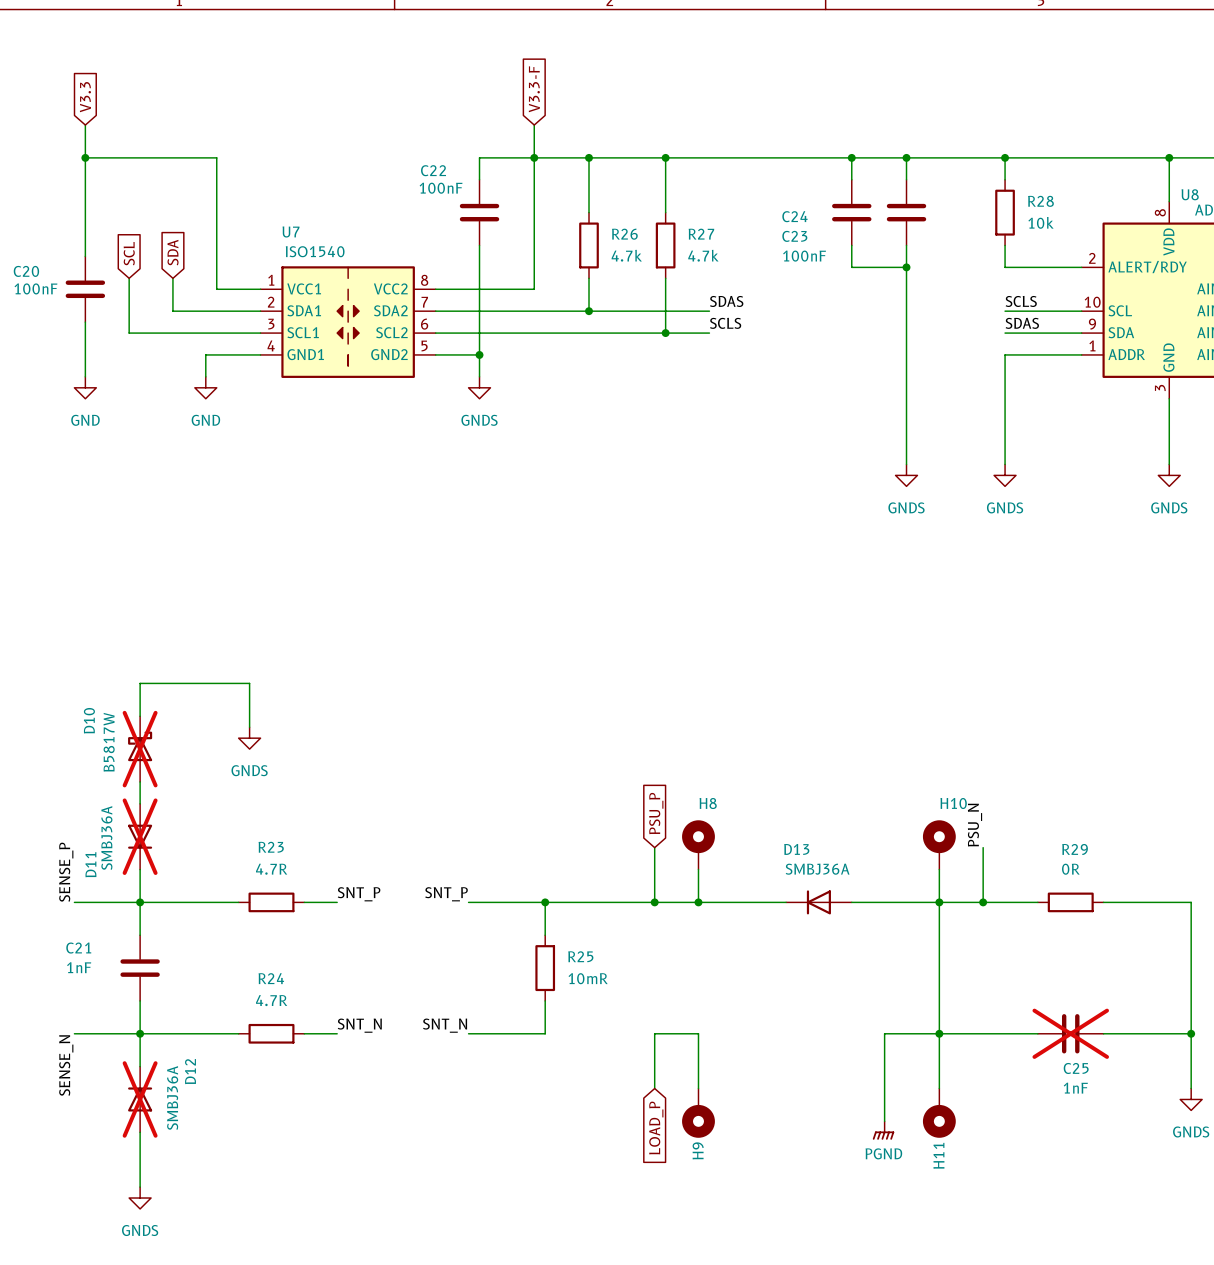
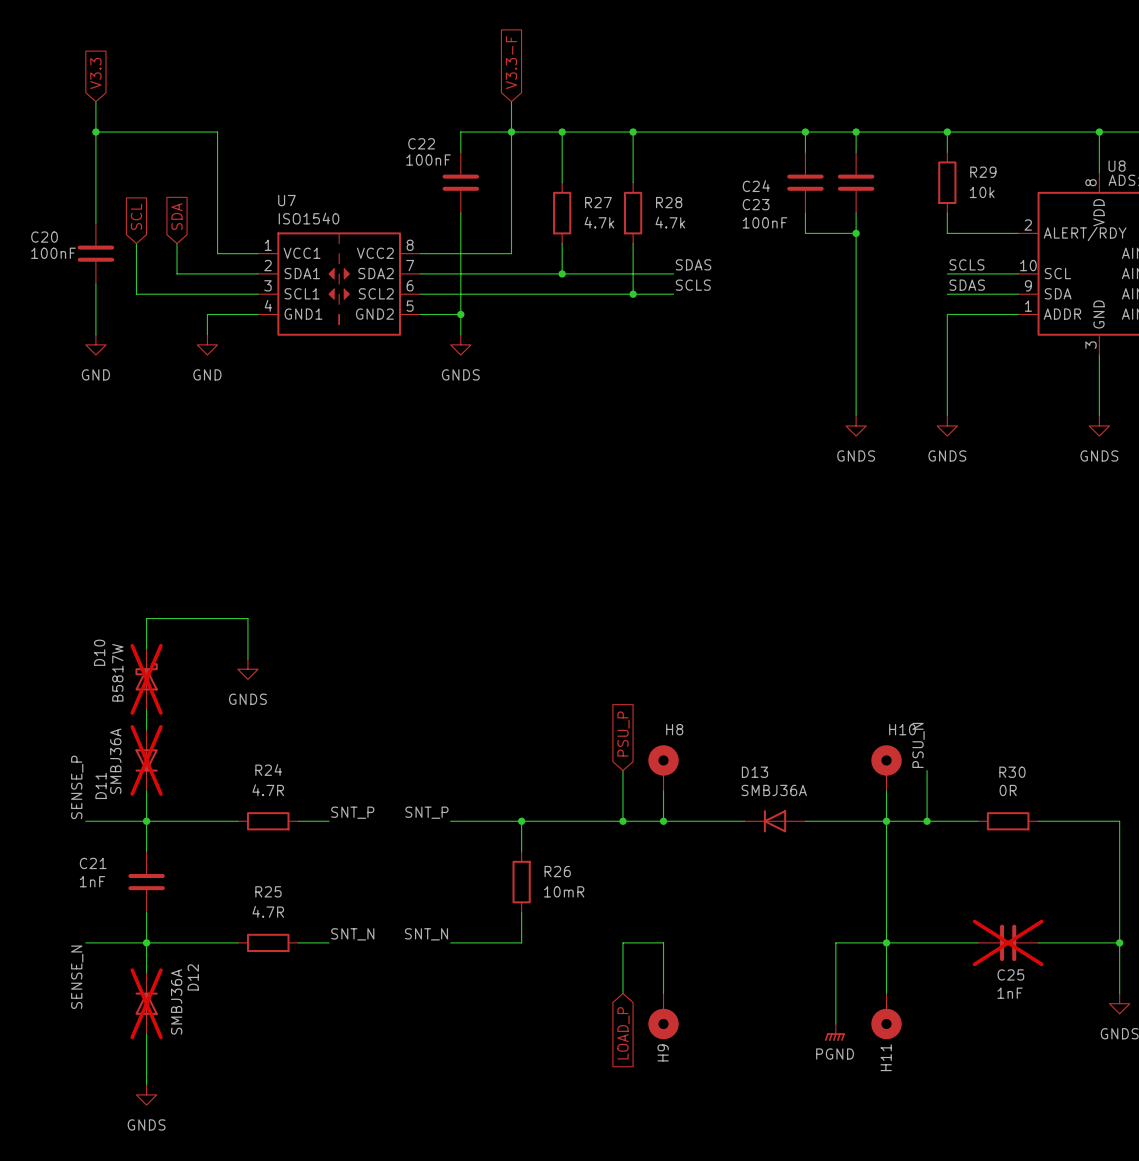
R28 name: R28 (1040, 201) -> R29 (983, 172)
R26 name: R26 (624, 234) -> R27 (598, 202)
R27 name: R27 (701, 234) -> R28 (669, 202)
R23 name: R23 (271, 847) -> R24 (268, 769)
R29 name: R29 (1075, 849) -> R30 (1012, 772)
R25 name: R25 (580, 956) -> R26 (557, 871)
R24 name: R24 (271, 978) -> R25 (268, 891)

